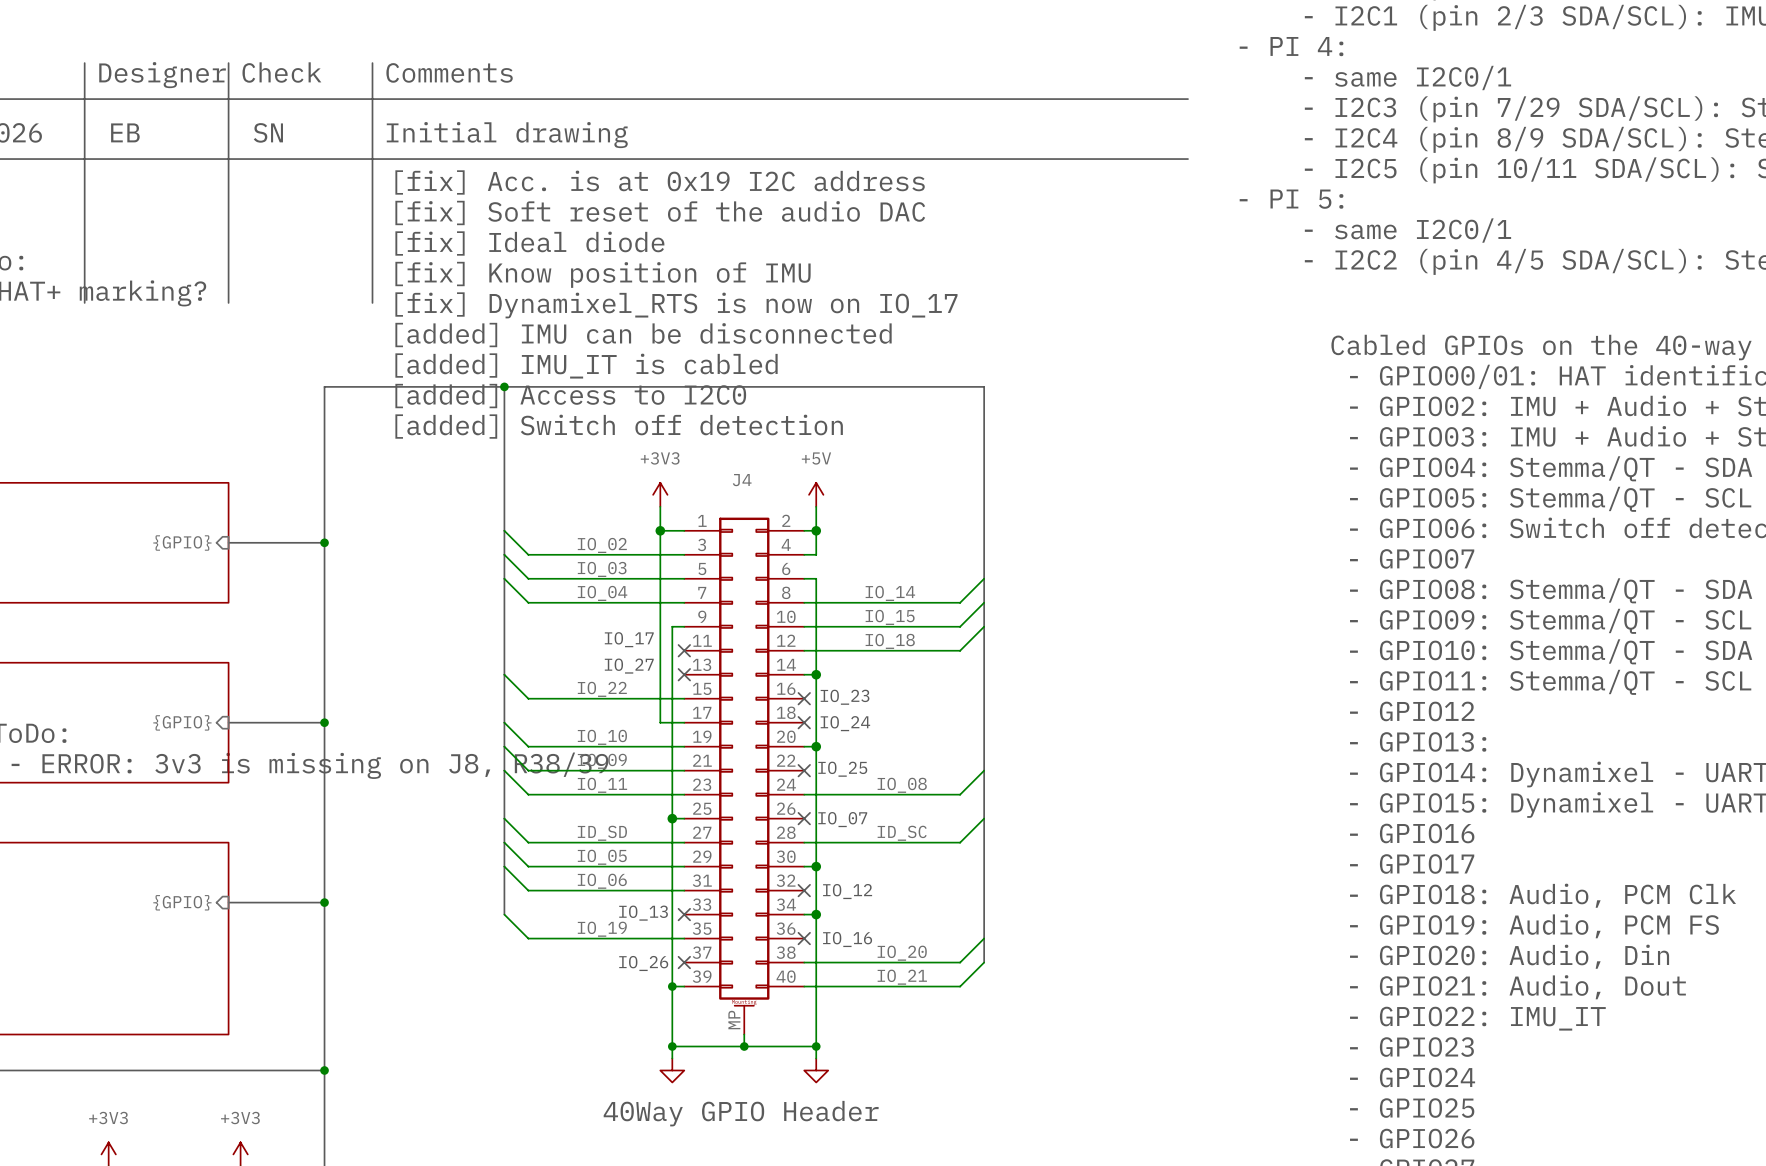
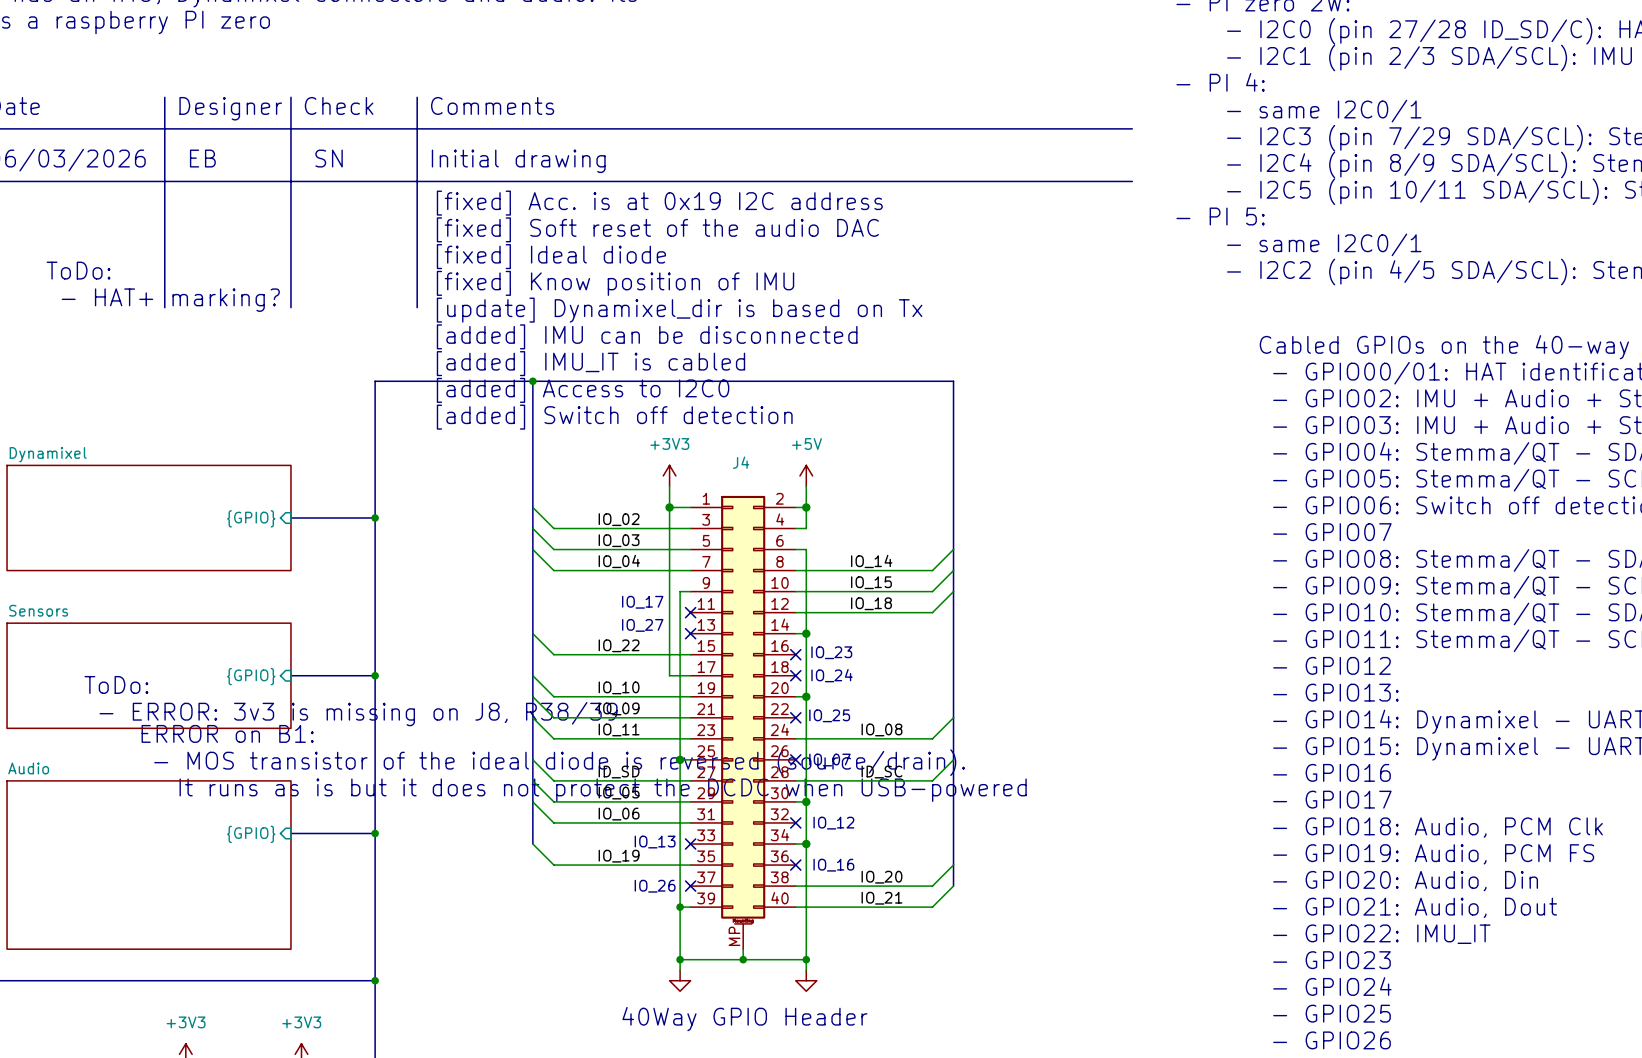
text: [fix] Acc. is at 0x19 I2C address (660, 182) -> [fixed] Acc. is at 0x19 I2C address (659, 203)
text: [fix] Soft reset of the audio DAC (660, 212) -> [fixed] Soft reset of the audio DAC (657, 229)
text: [fix] Ideal diode (529, 243) -> [fixed] Ideal diode (551, 256)
text: [fix] Know position of IMU (603, 274) -> [fixed] Know position of IMU (615, 283)
text: [fix] Dynamixel_RTS is now on IO_17 (676, 305) -> [update] Dynamixel_dir is based on Tx (679, 310)
text: none -> ERROR on B1: (227, 733)
text: none -> - MOS transistor of the ideal diode is reversed (source/drain). (559, 762)
text: none -> It runs as is but it does not protect the DCDC when USB-powered (603, 790)

